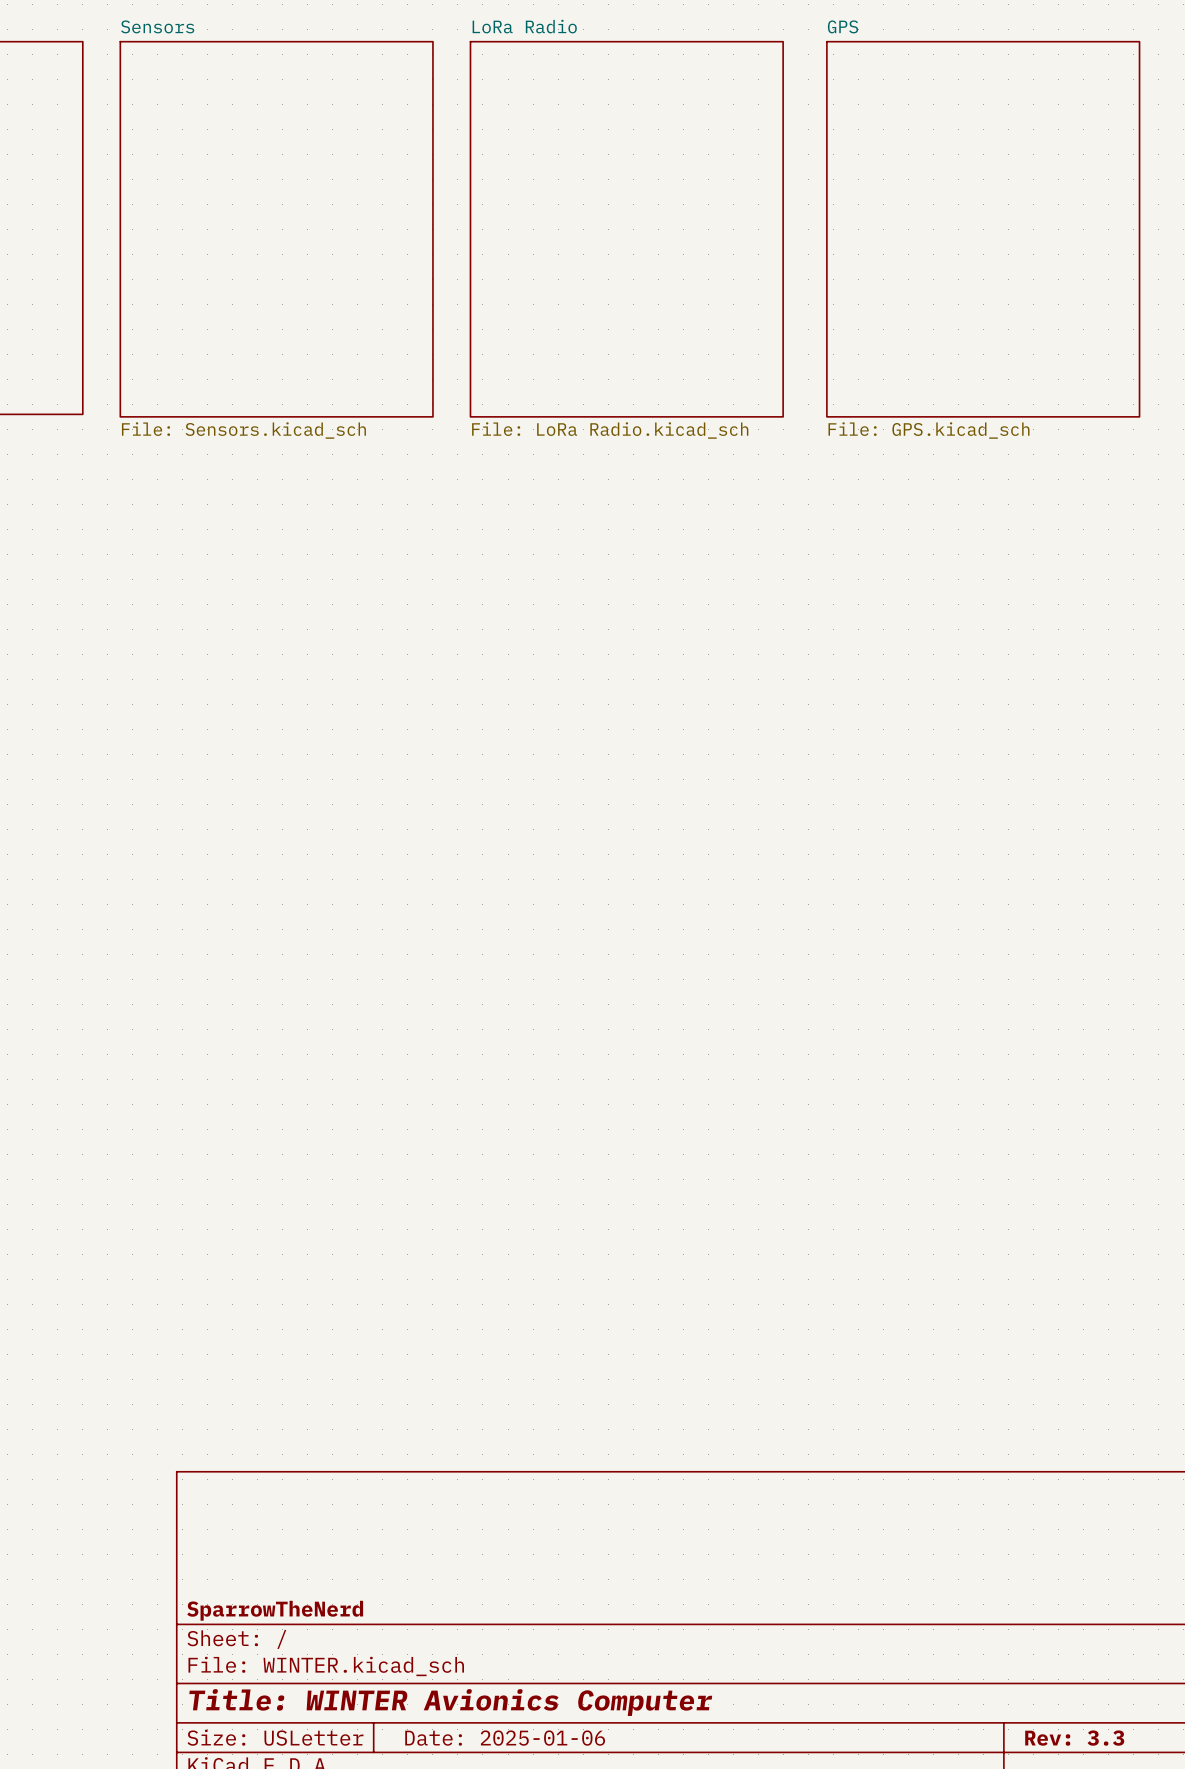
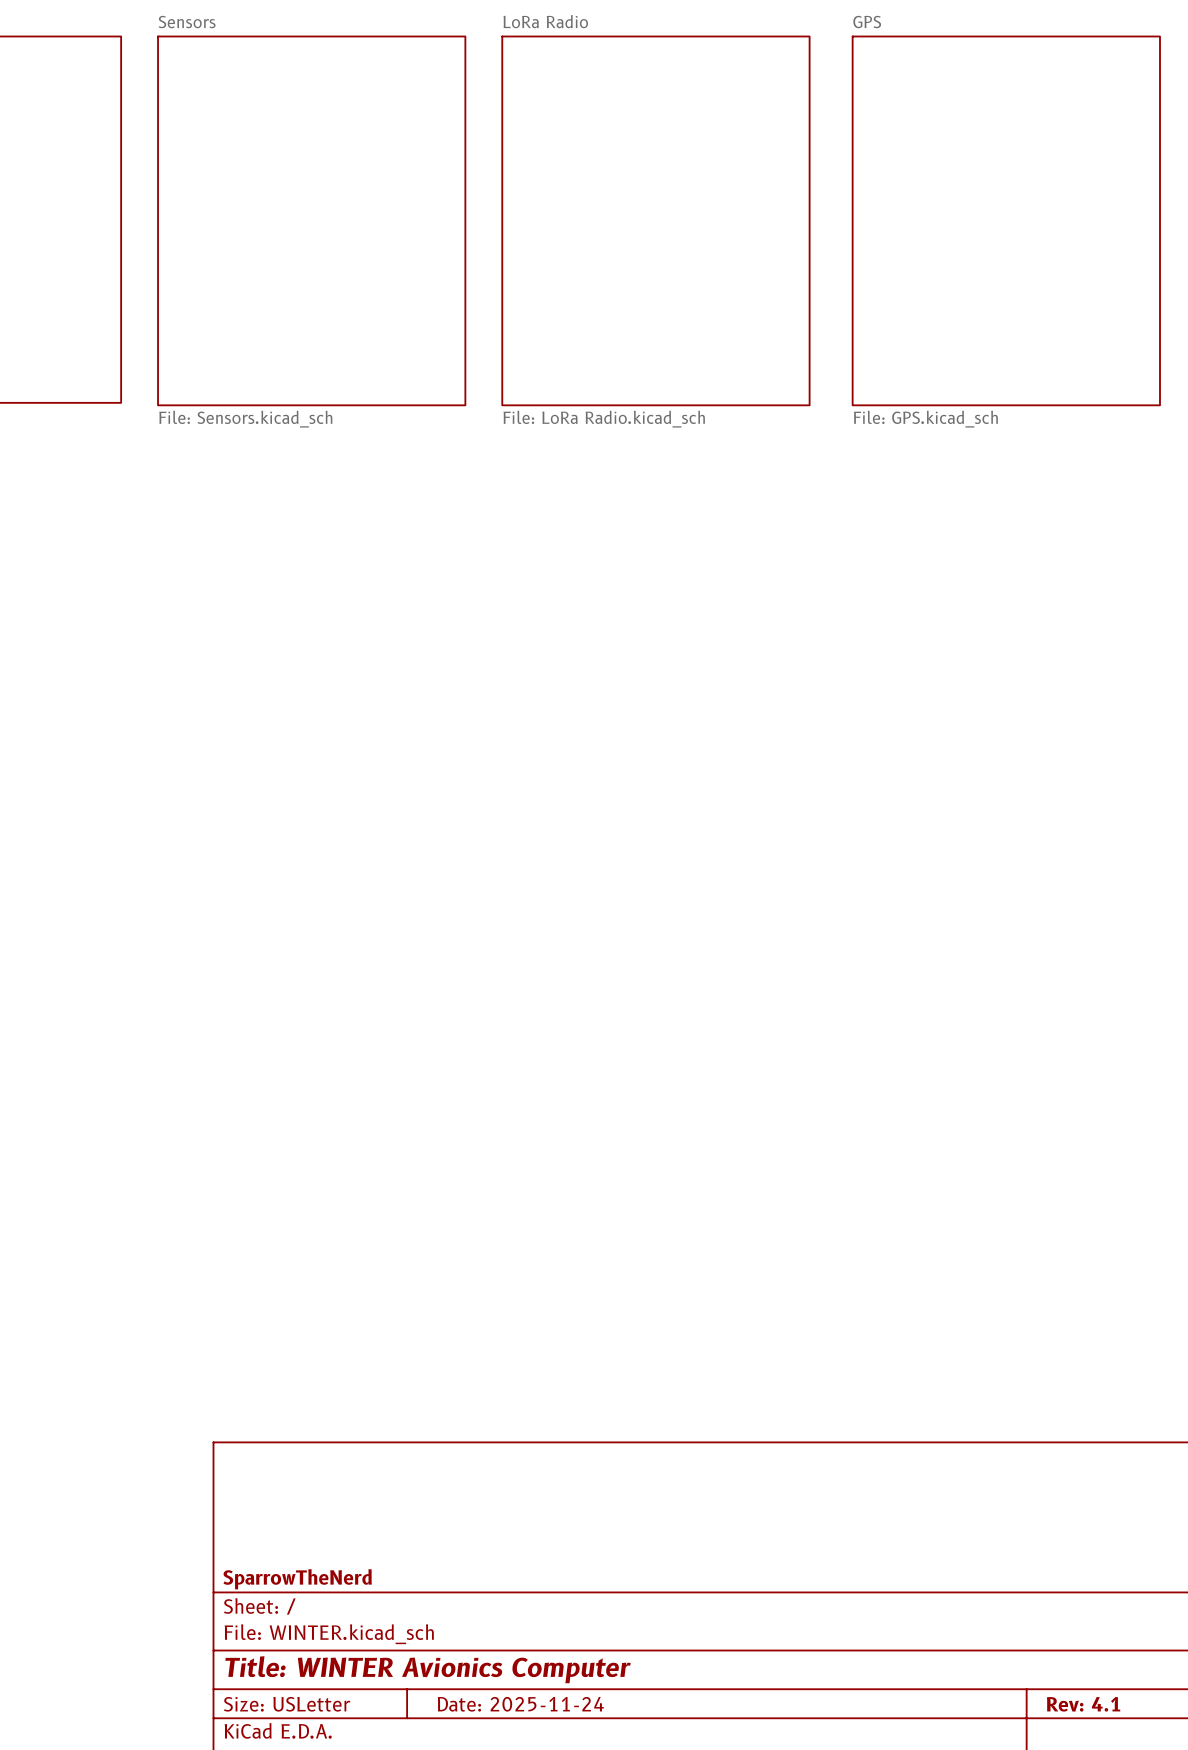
title block: Date: 2025-01-06 (505, 1738) -> Date: 2025-11-24 (520, 1704)
title block: Rev: 3.3 (1074, 1738) -> Rev: 4.1 (1083, 1704)

